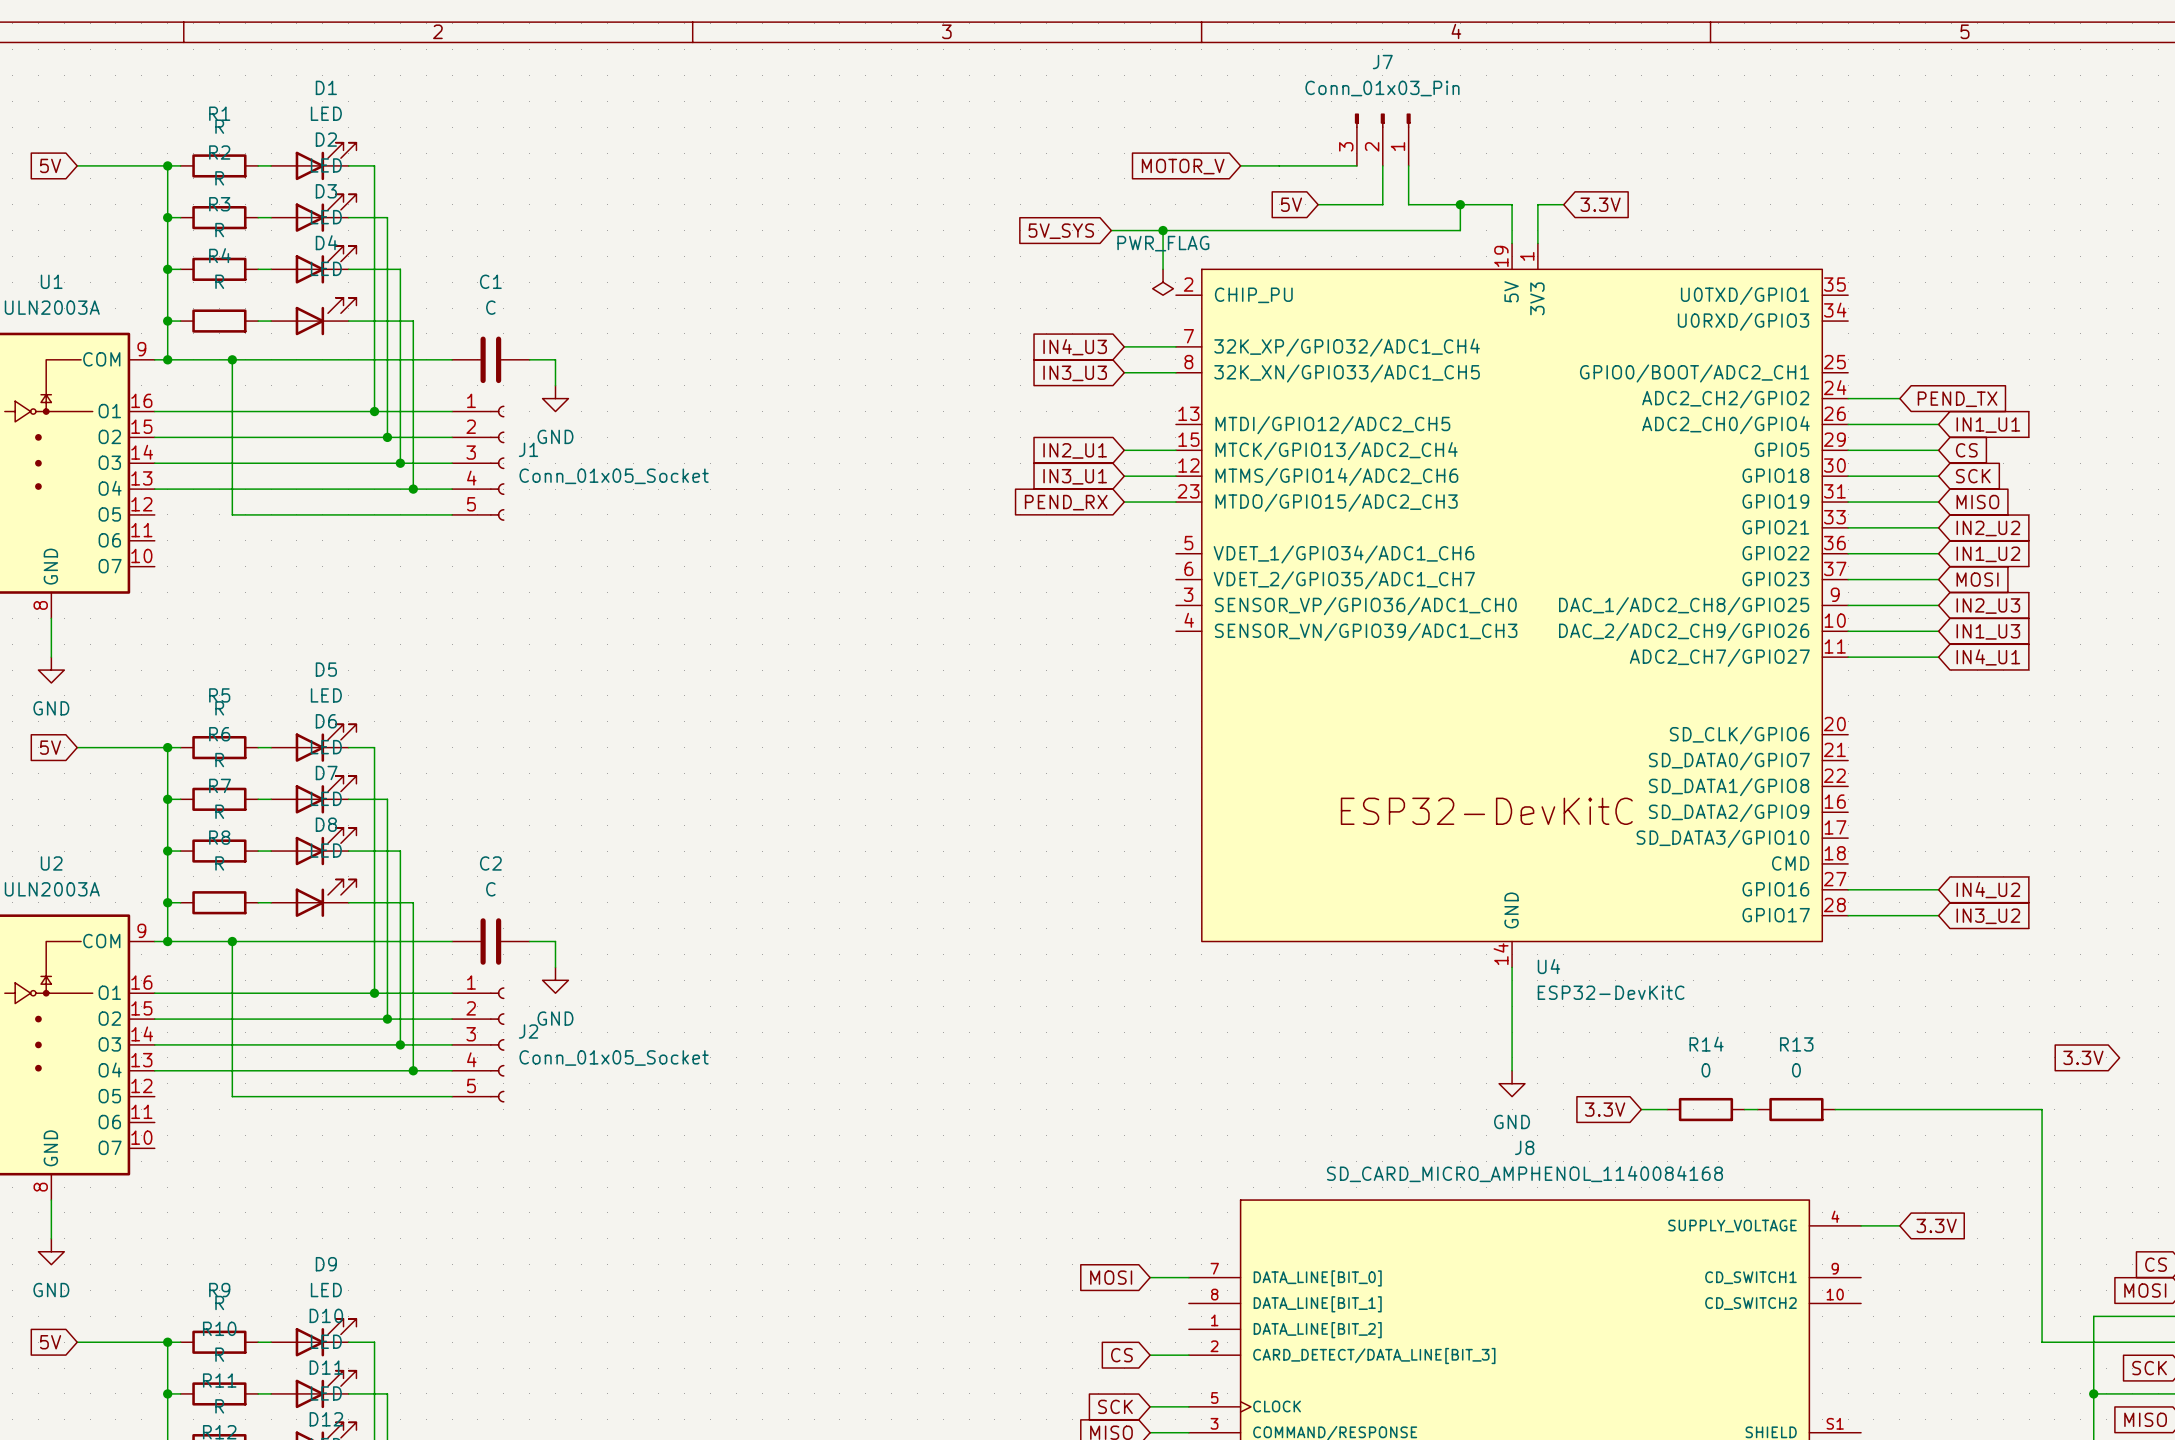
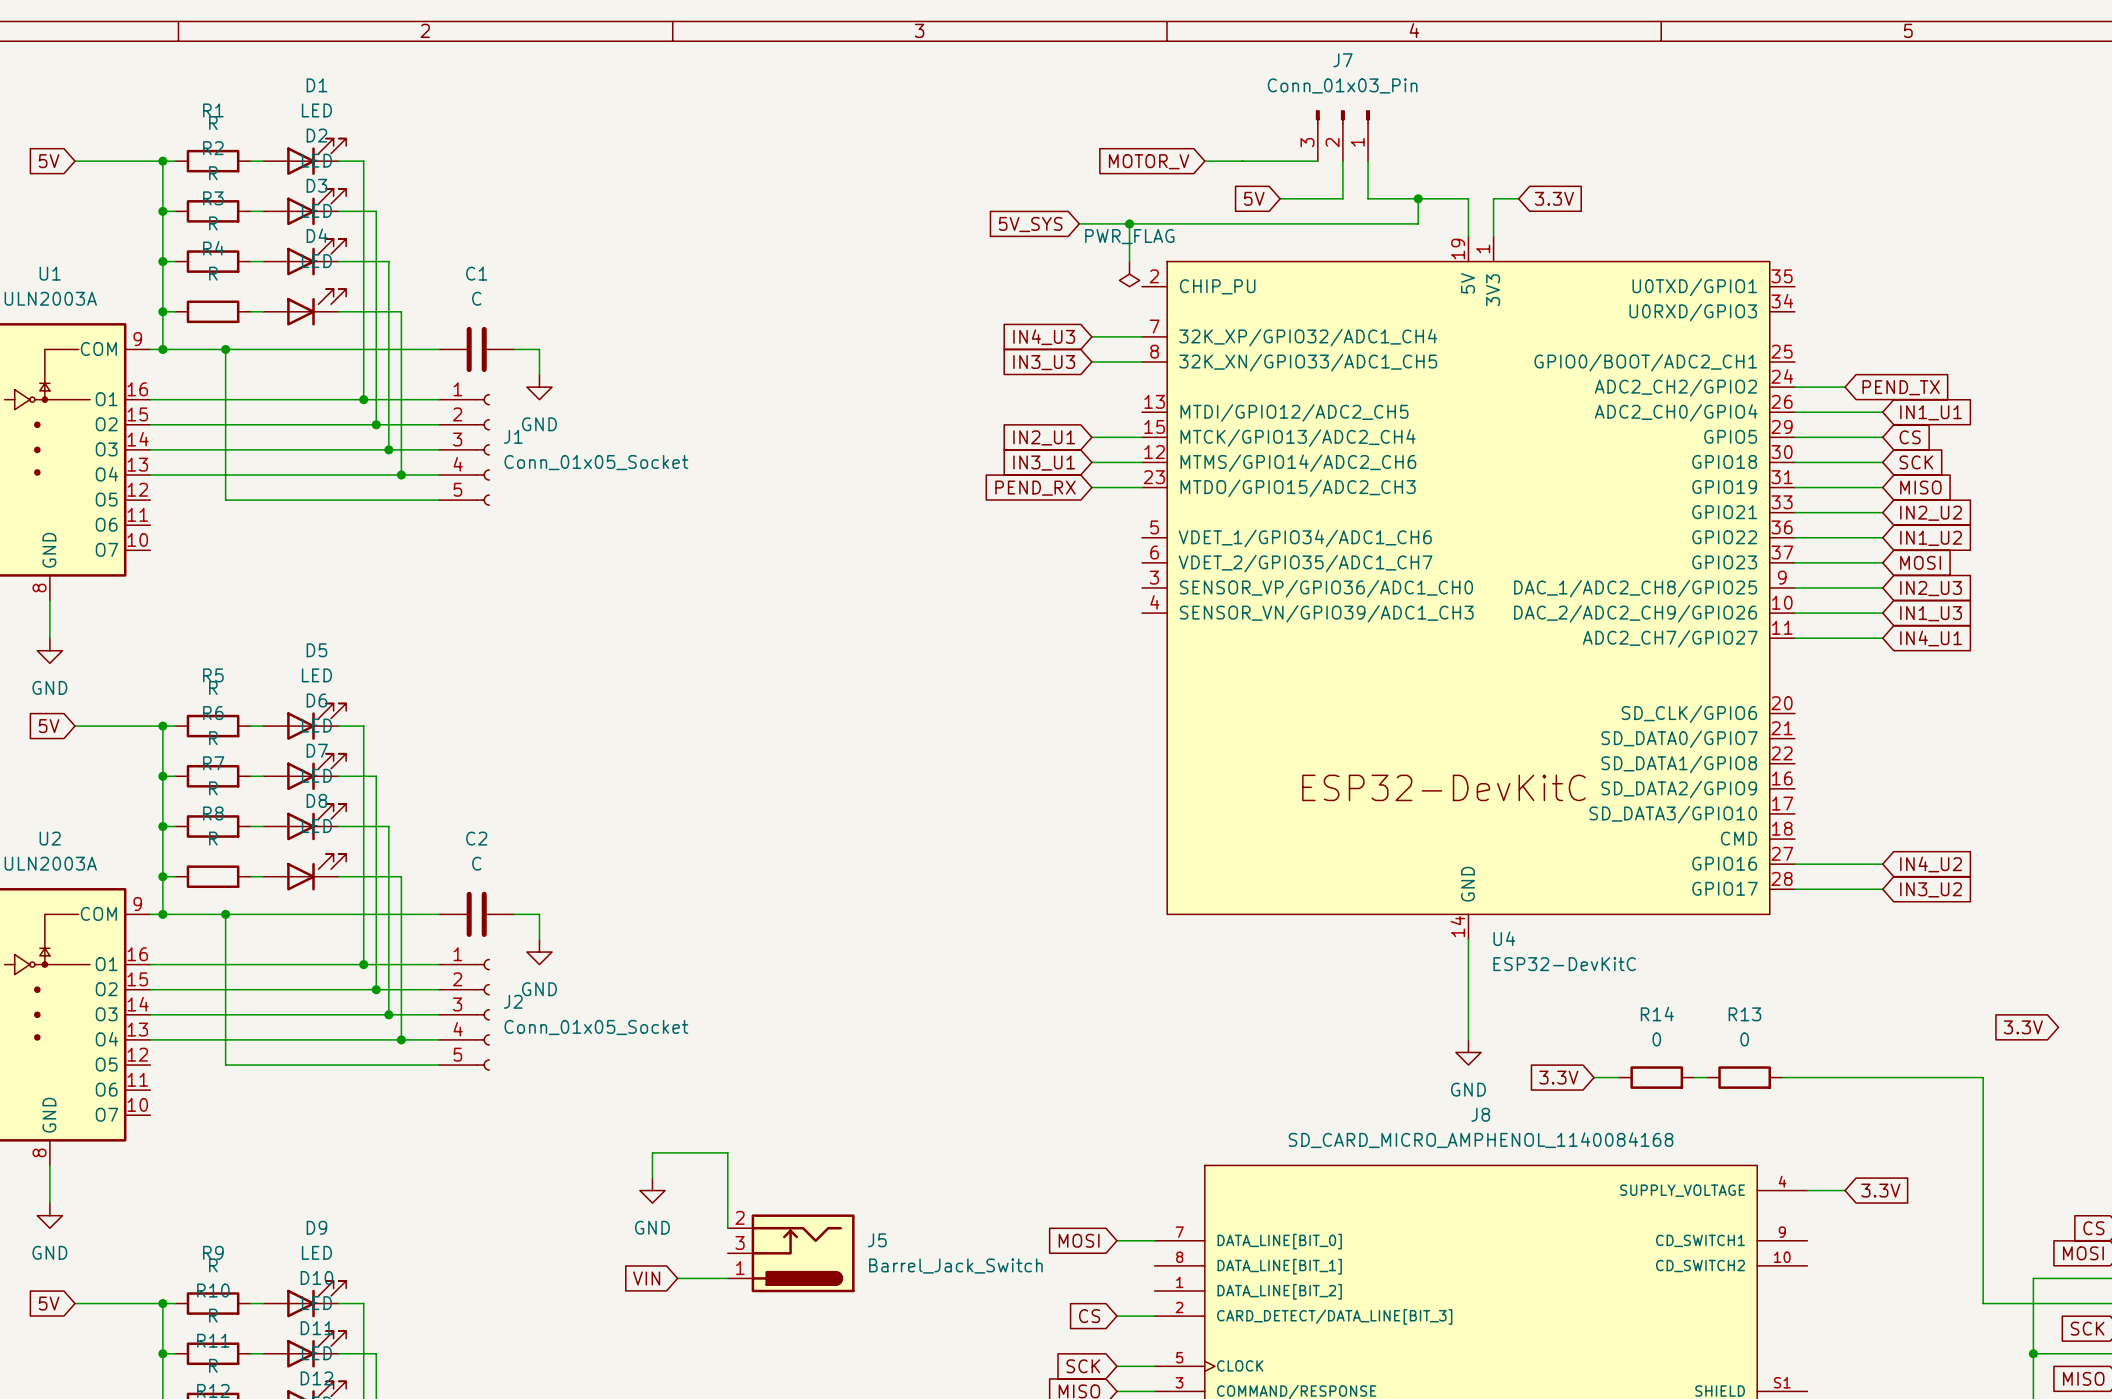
wire: none -> (652, 1178) (652, 1152) (727, 1152) (727, 1228)
power symbol: none -> GND (652, 1190)
J5: none -> Barrel_Jack_Switch (791, 1253)
global label: none -> VIN (646, 1278)
wire: none -> (677, 1278) (727, 1278)

